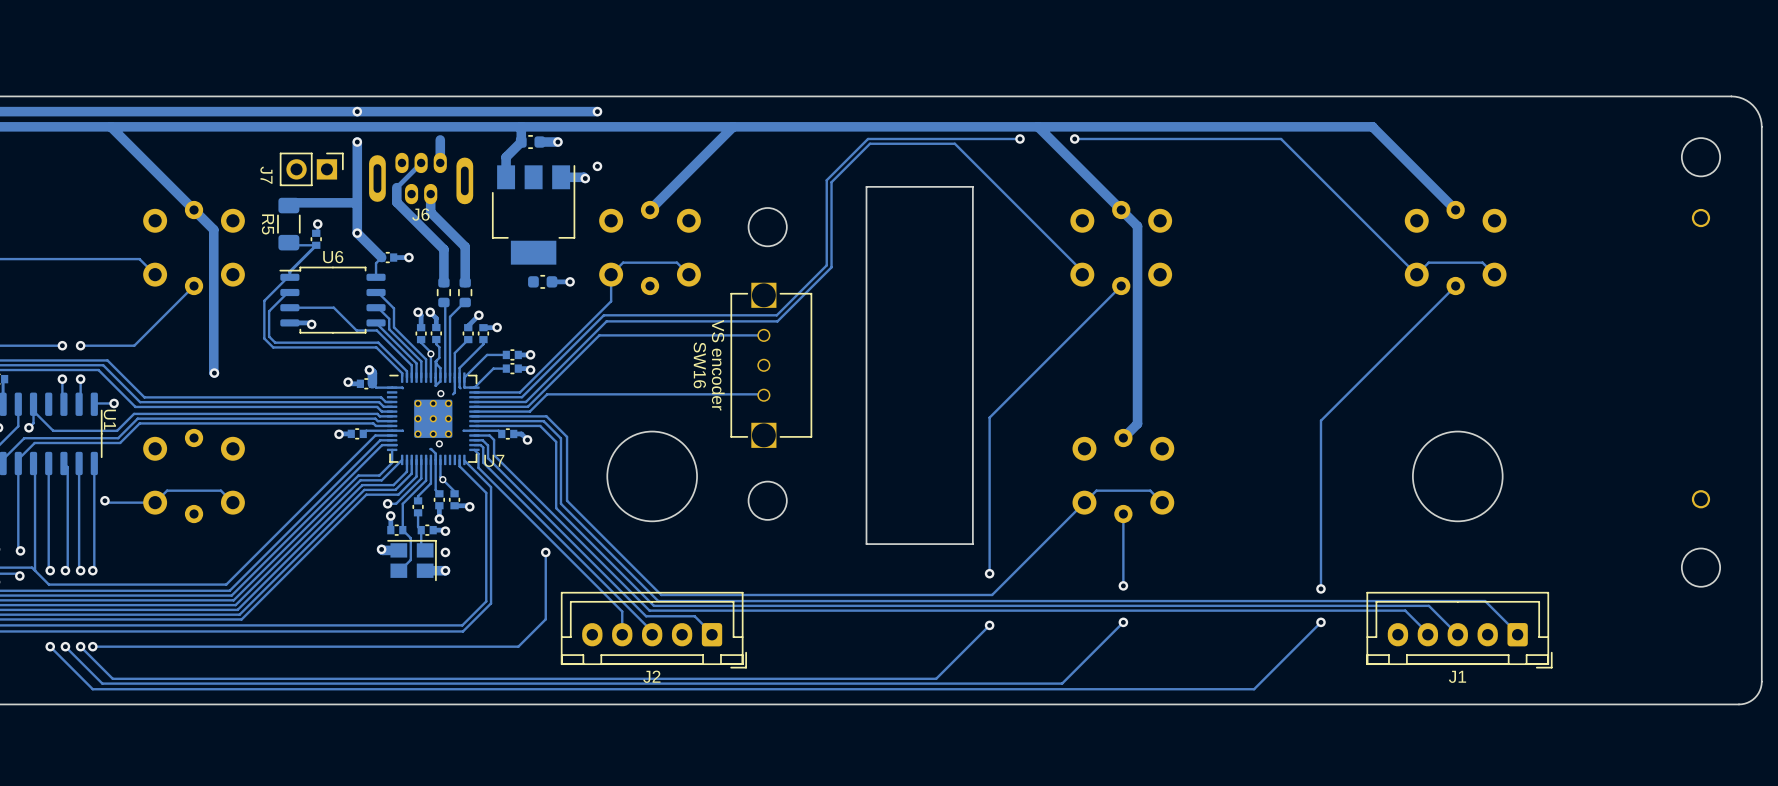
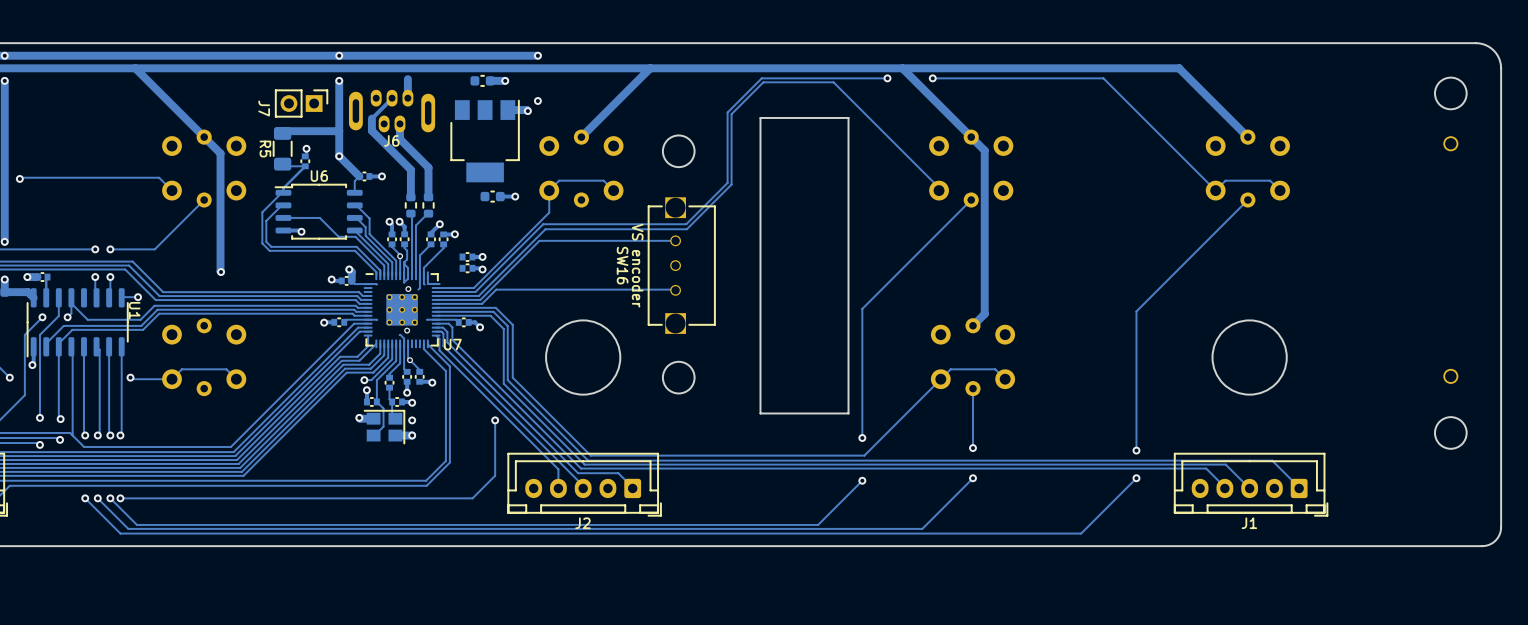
track: (521, 126) (521, 142) (506, 157) (506, 177) -> none
track: (506, 354) (487, 354) (464, 377) -> none
track: (506, 368) (493, 368) (474, 387) -> none

